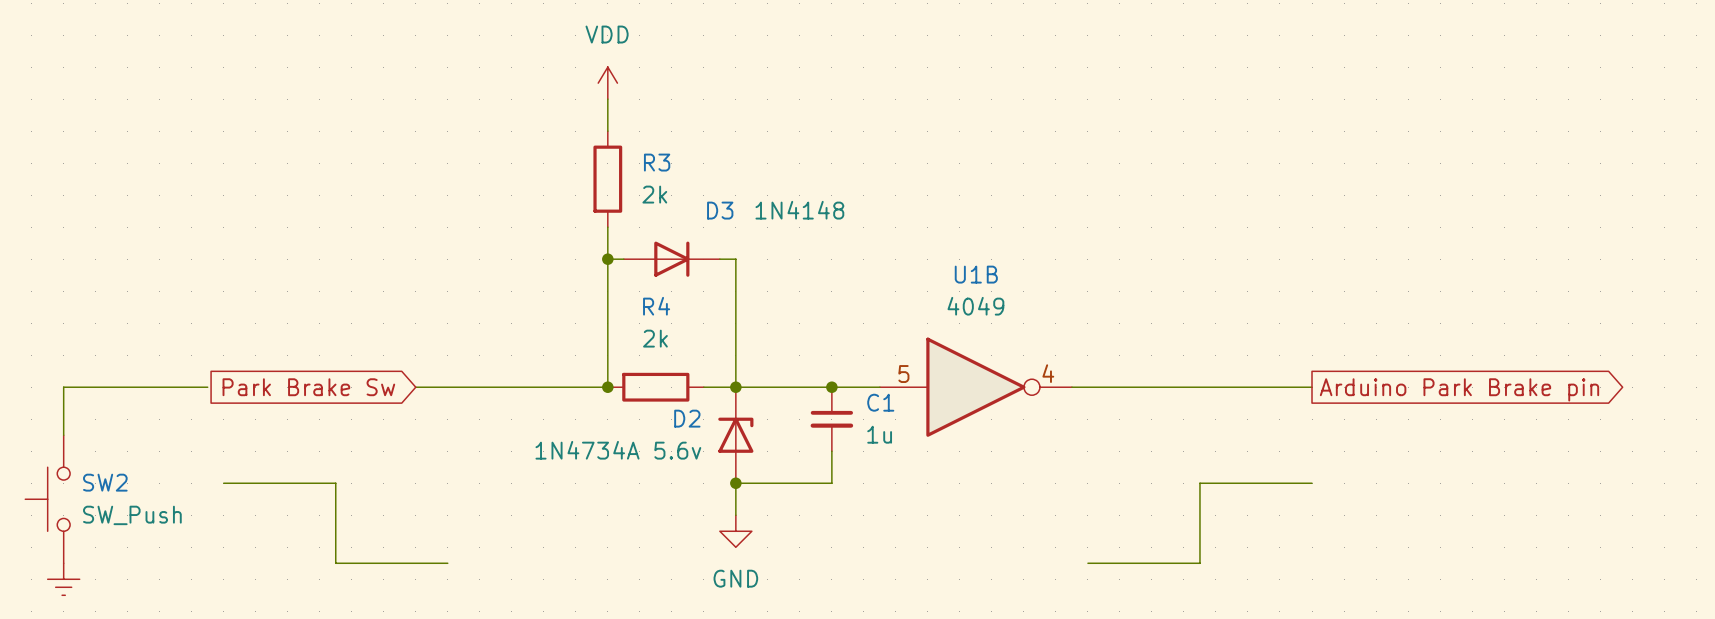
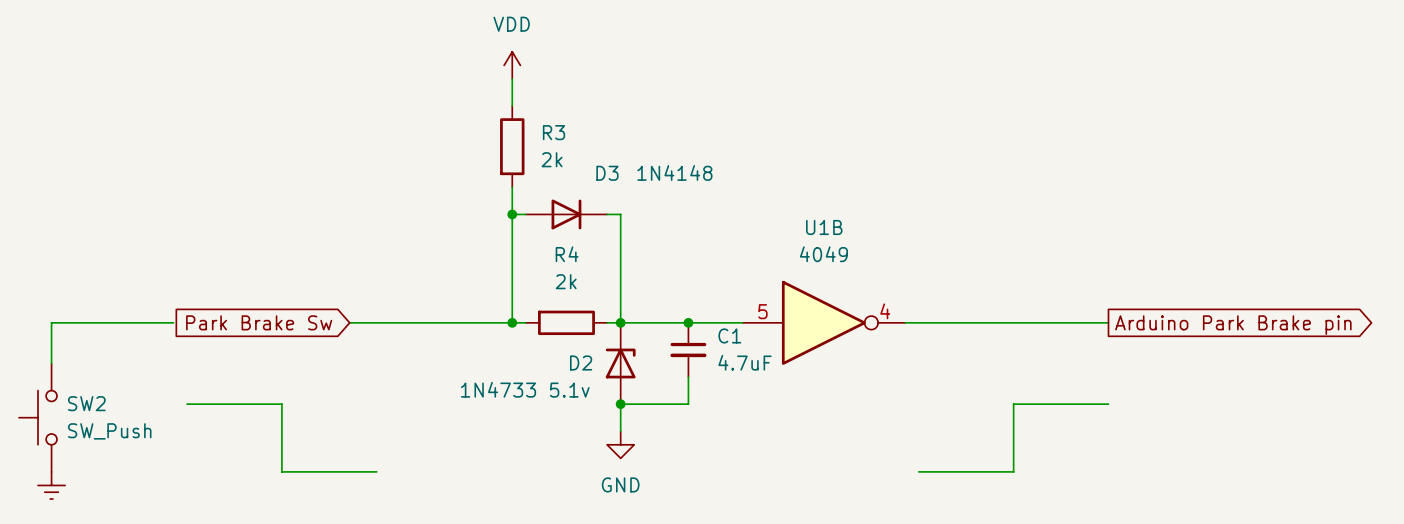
R4 position: (655, 387) -> (566, 322)
junction position: (831, 387) -> (688, 322)
D2 name position: D2 (687, 418) -> D2 (581, 362)
C1 position: (831, 419) -> (688, 349)
C1 value: 1u (879, 434) -> 4.7uF (744, 362)
D2 value: 1N4734A 5.6v (618, 450) -> 1N4733 5.1v (525, 389)
wire: (831, 451) (831, 483) (815, 483) -> (688, 377) (688, 404)

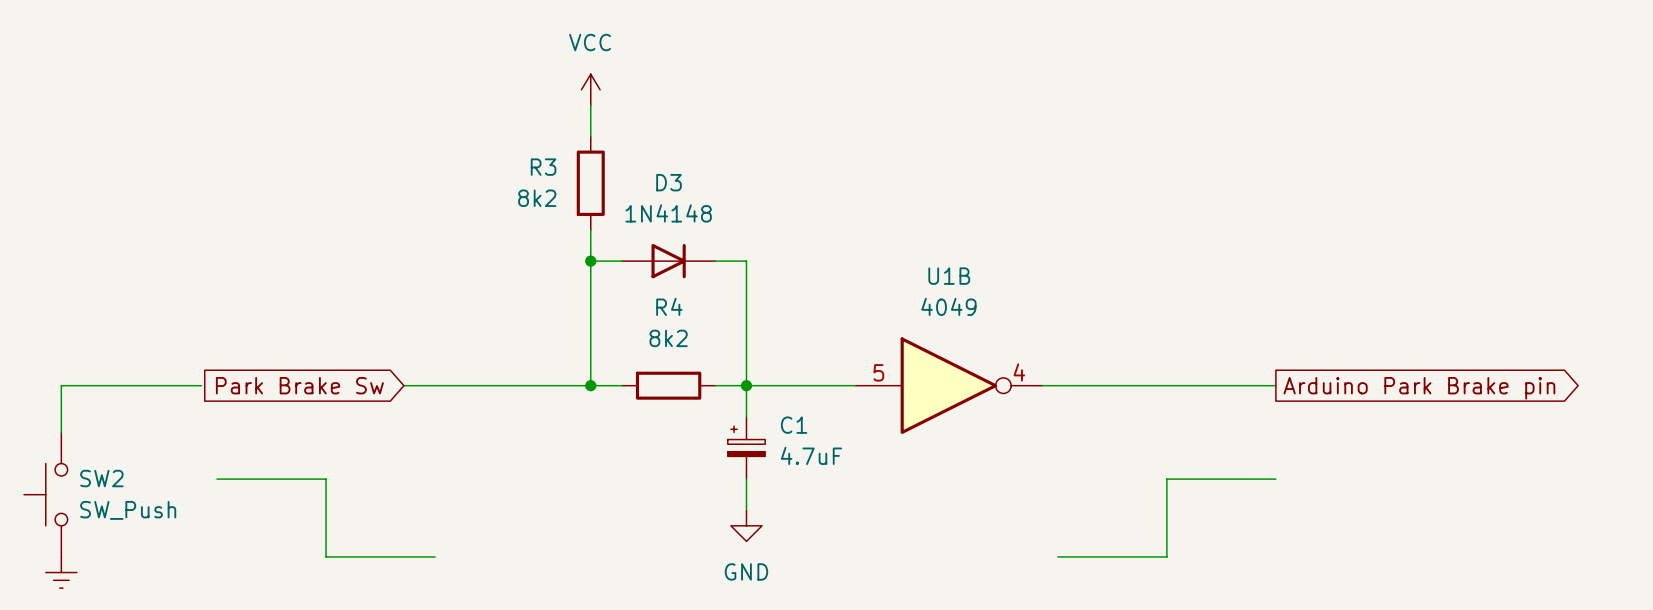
power symbol: VDD (512, 65) -> VCC (590, 89)
R3 name position: R3 (553, 132) -> R3 (543, 167)
R3 value: 2k (552, 159) -> 8k2 (537, 198)
D3 value position: 1N4148 (674, 172) -> 1N4148 (668, 213)
D3 name position: D3 (607, 173) -> D3 (668, 182)
D3 position: (566, 214) -> (668, 261)
wire: (607, 214) (620, 214) (620, 322) (607, 322) -> none
wire: none -> (715, 261) (746, 261) (746, 416)
R4 value: 2k (566, 281) -> 8k2 (668, 338)
R4 position: (566, 322) -> (668, 385)
junction: (620, 322) -> none
junction: none -> (746, 385)
C1 symbol: [670, 322, 707, 378] -> [727, 416, 766, 480]
junction: (688, 322) -> none
D2: 1N4733 5.1v (620, 363) -> none
wire: (688, 377) (688, 404) (620, 404) (620, 431) -> none
junction: (620, 404) -> none
wire: none -> (746, 479) (746, 510)
power symbol position: GND (620, 444) -> GND (746, 525)

